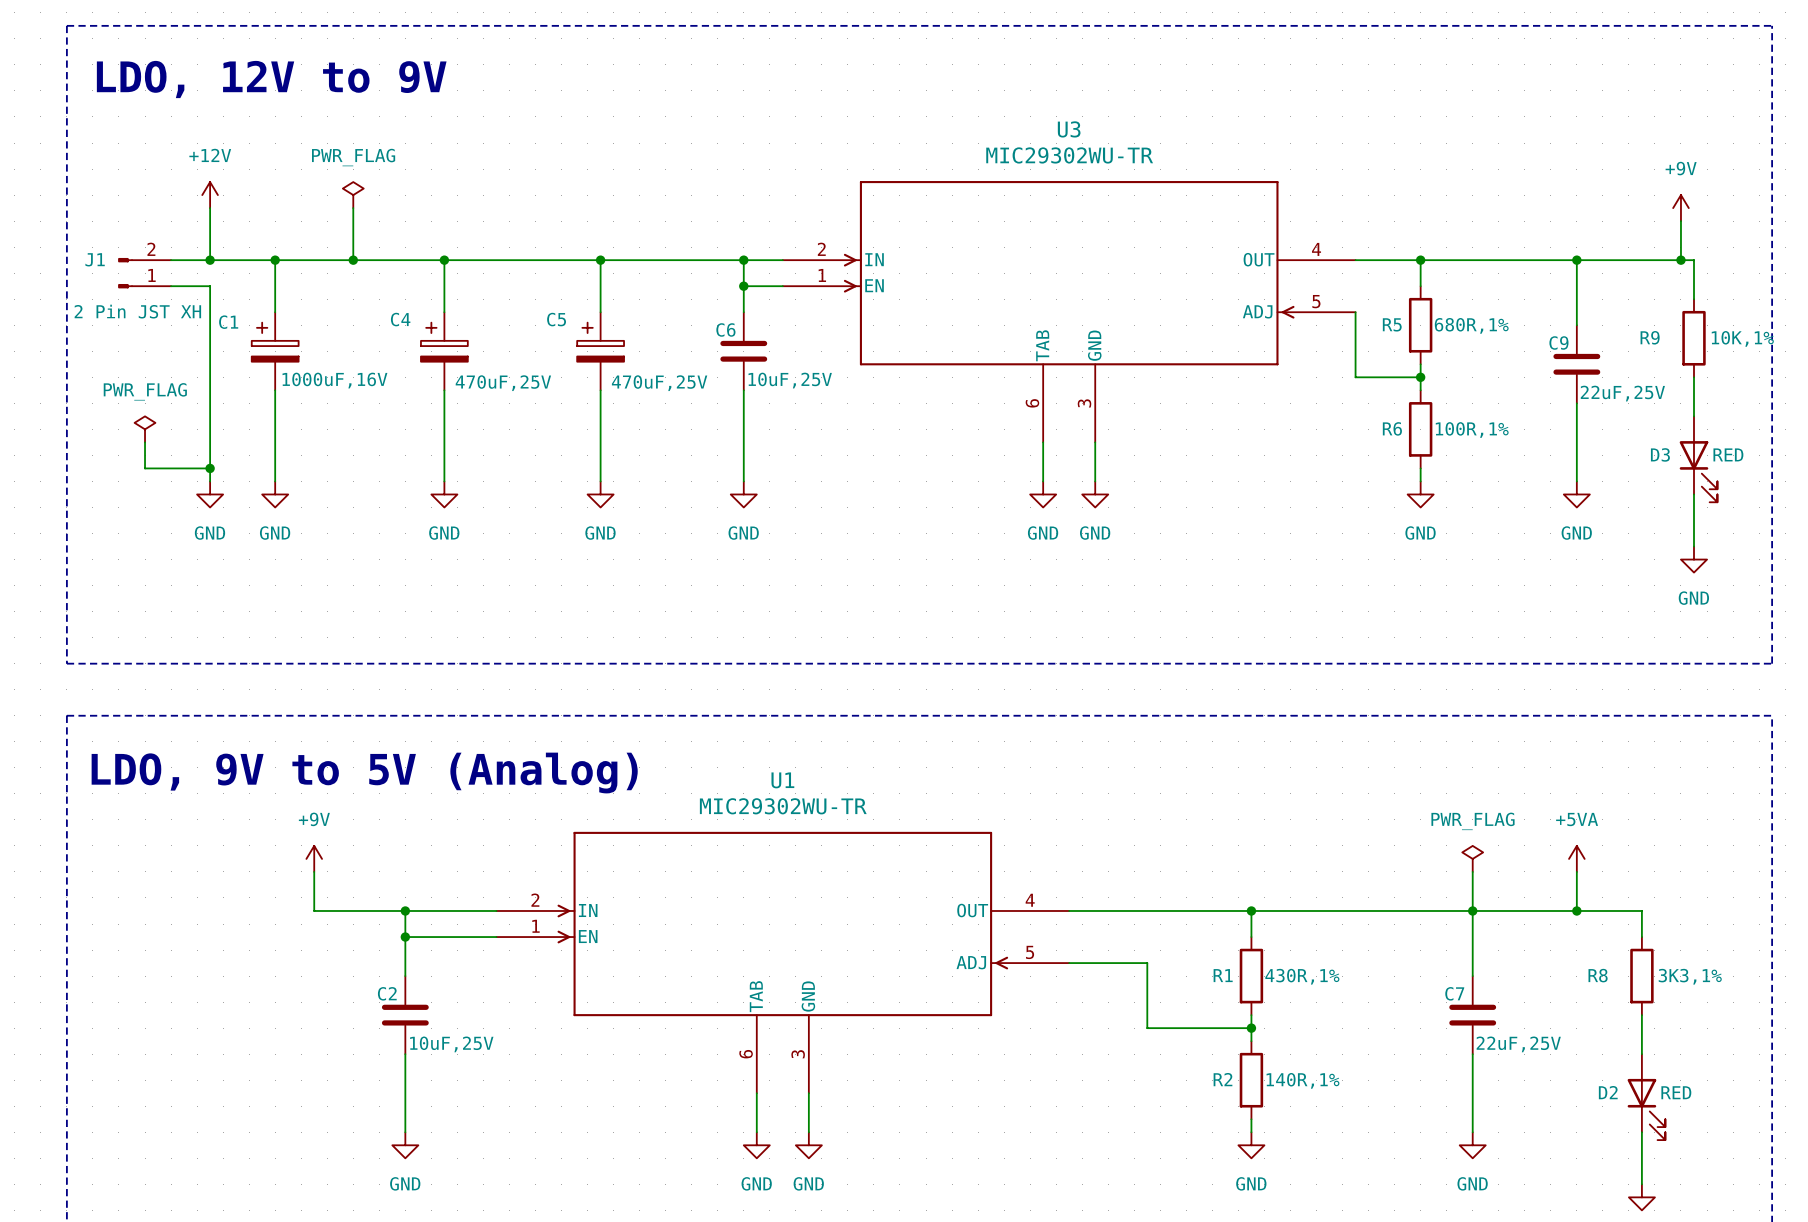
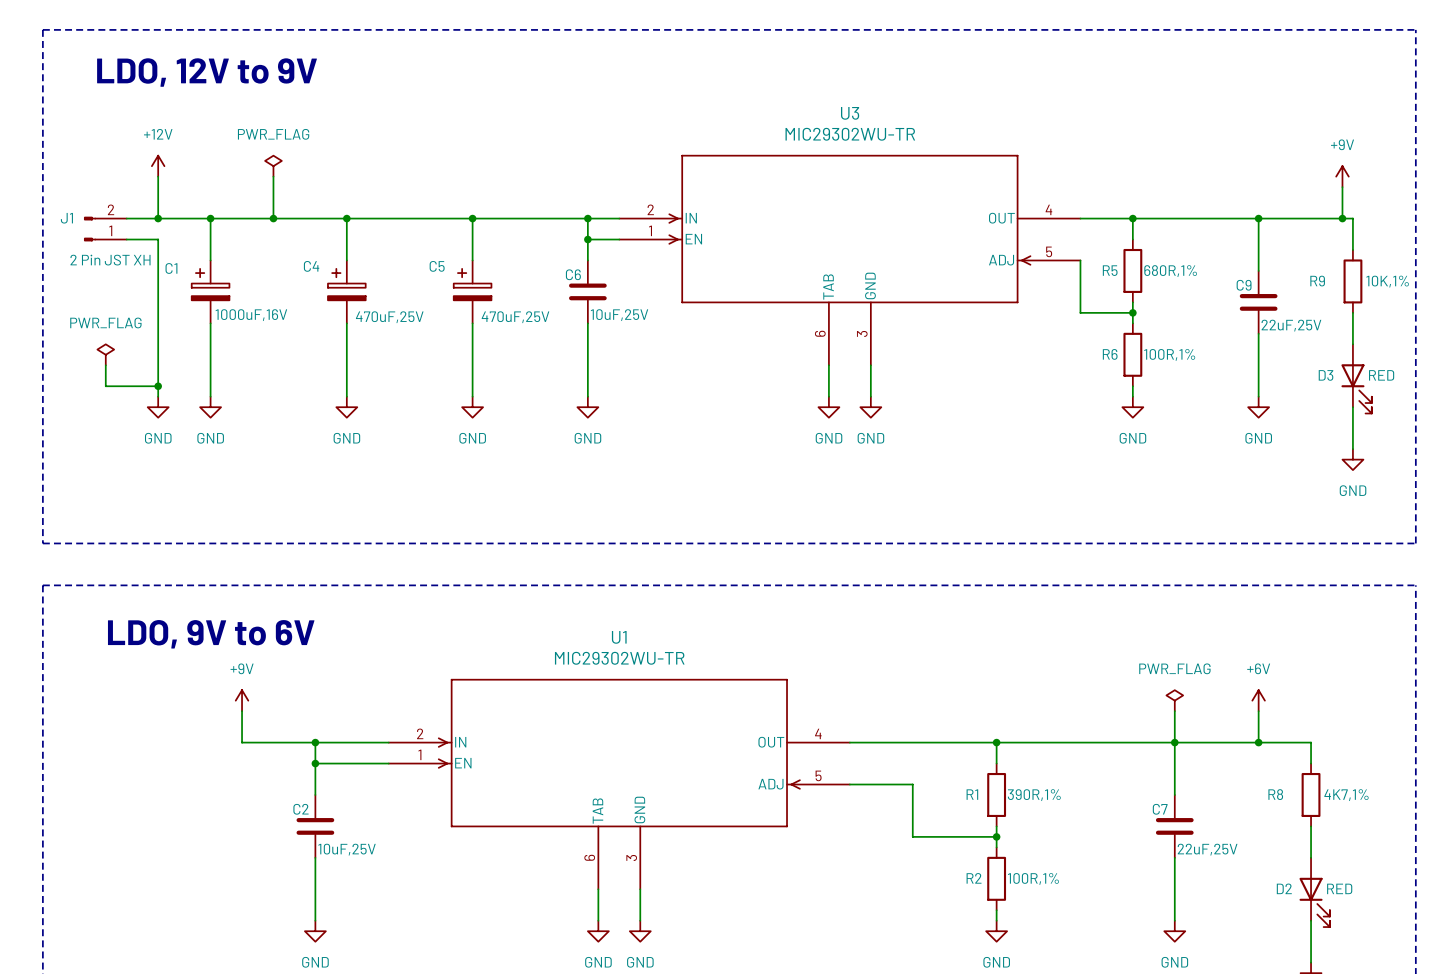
text: LDO, 9V to 5V (Analog) (364, 773) -> LDO, 9V to 6V (211, 634)
power symbol: +5VA (1576, 858) -> +6V (1258, 700)
R1 value: 430R,1% (1302, 976) -> 390R,1% (1034, 795)
R8 value: 3K3,1% (1690, 976) -> 4K7,1% (1346, 795)
R2 value: 140R,1% (1302, 1080) -> 100R,1% (1033, 878)

